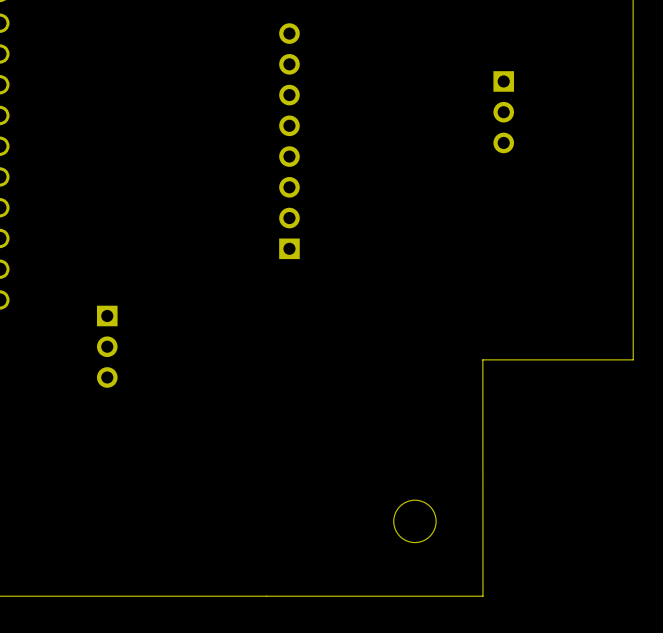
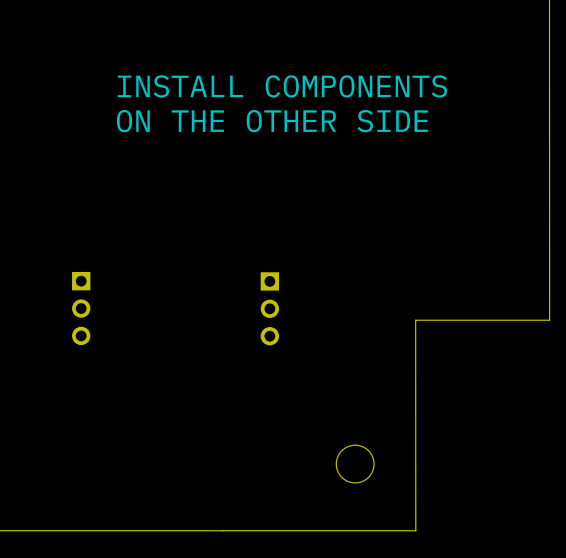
text: none -> INSTALL COMPONENTS (282, 86)
part position: (503, 112) -> (269, 308)
text: none -> ON THE OTHER SIDE (272, 121)
part: (289, 141) -> none

